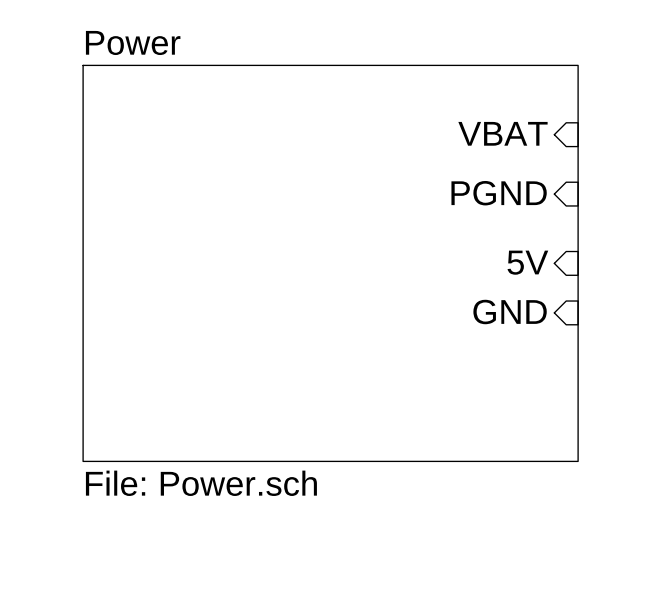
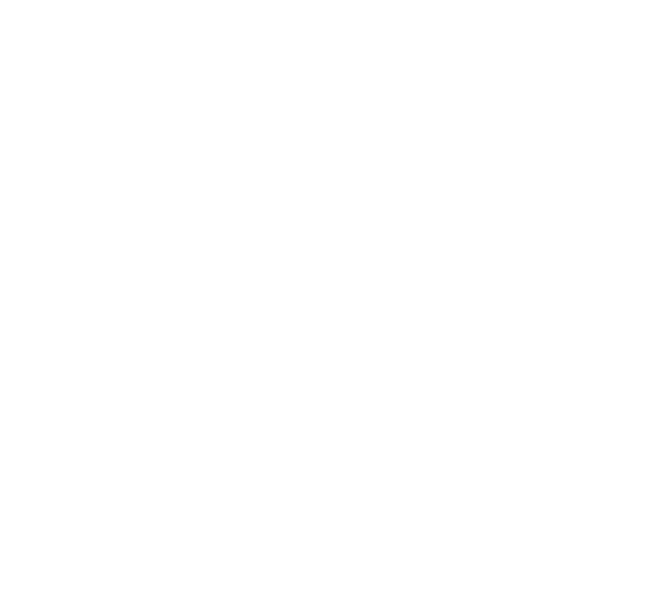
sheet pin: VBAT (502, 133) -> none
sheet pin: PGND (499, 193) -> none
sheet pin: 5V (527, 262) -> none
sheet Power: File: Power.sch (330, 263) -> none
sheet pin: GND (510, 312) -> none

